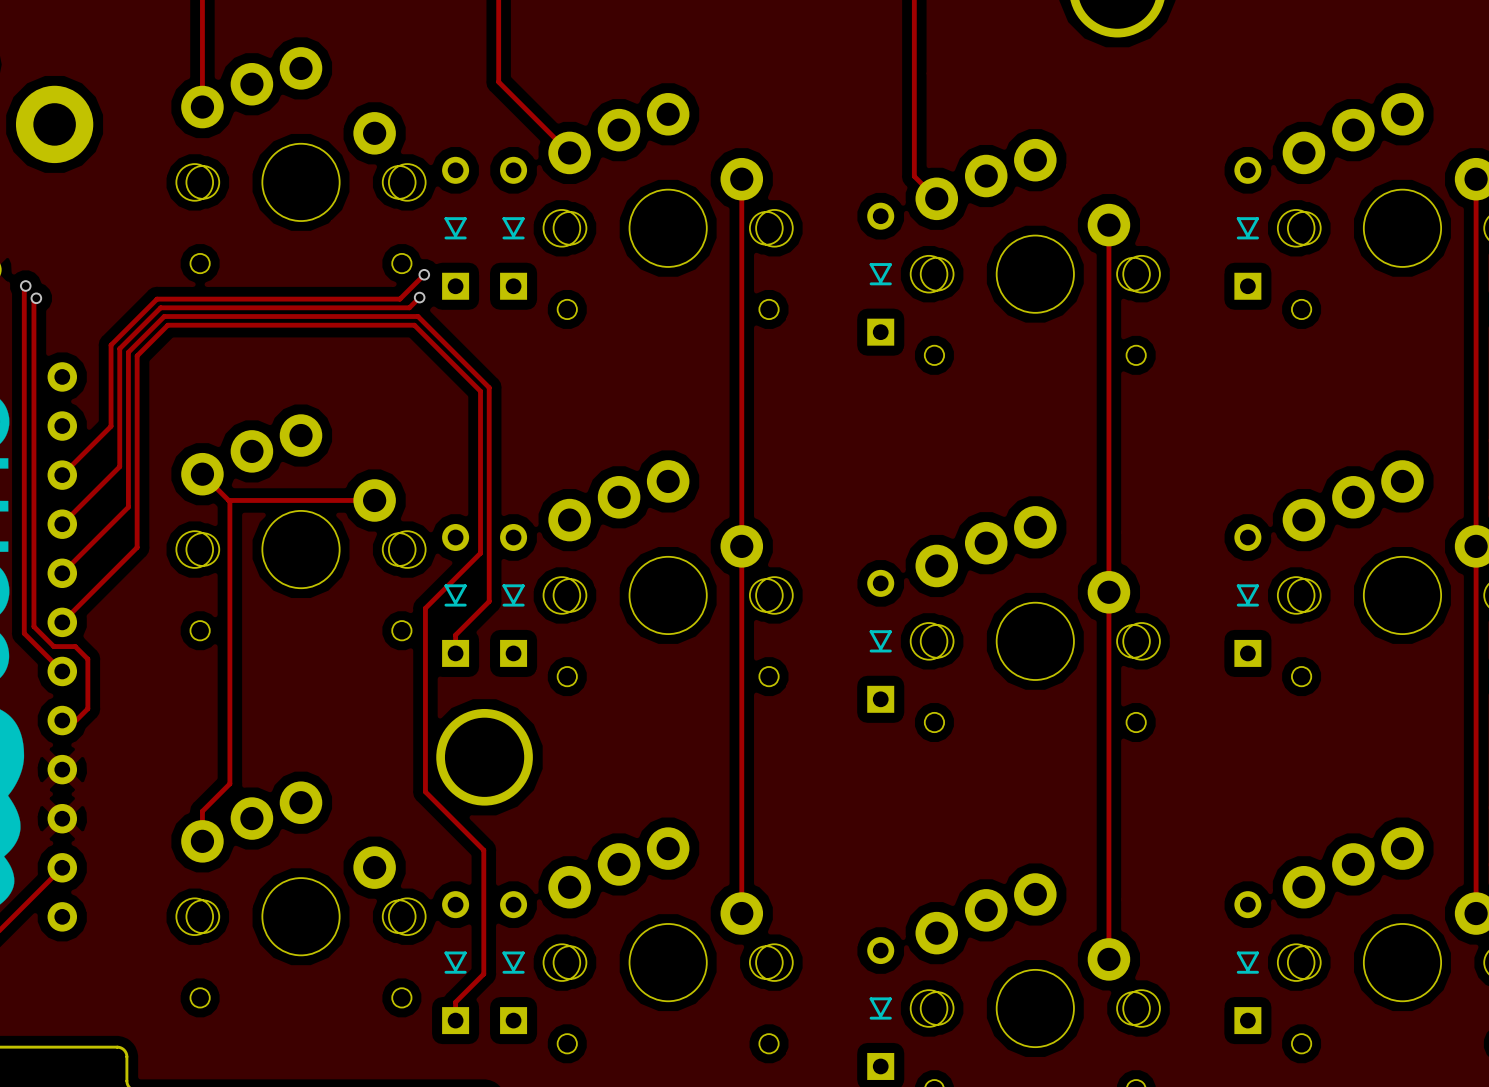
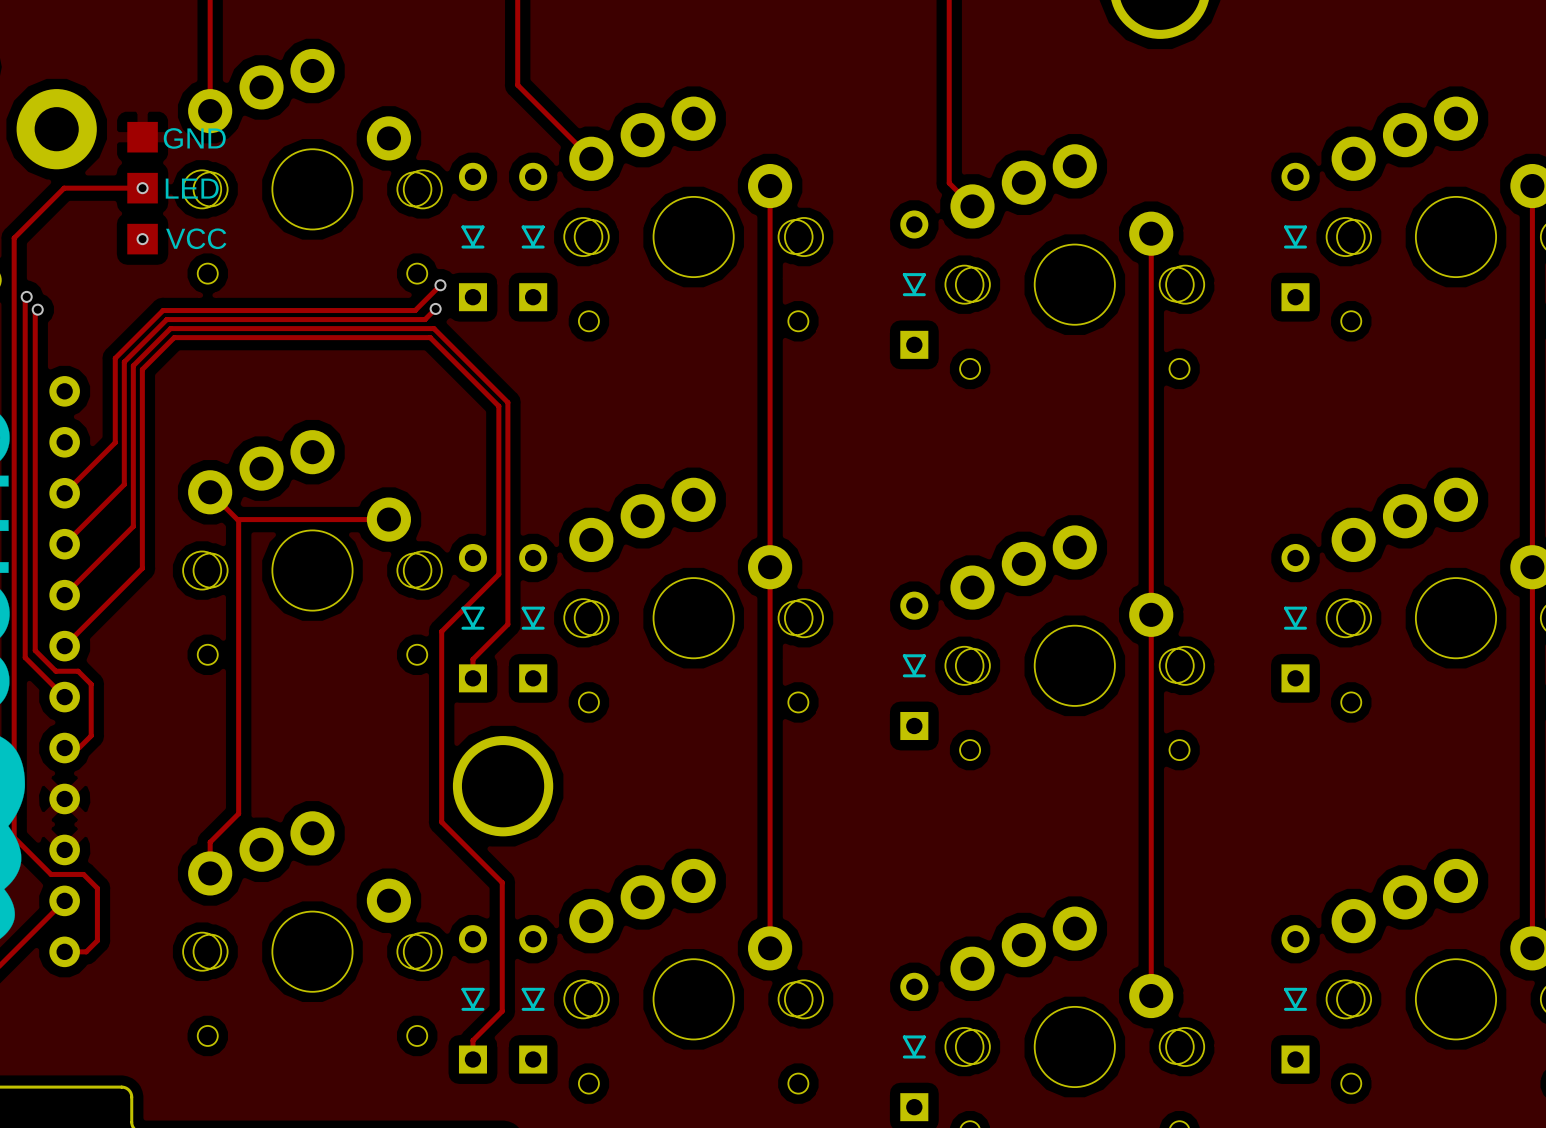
track: none -> (142, 188) (64, 188) (14, 238) (14, 837) (51, 874) (83, 874) (97, 888) (97, 940) (86, 951) (64, 951)
part: none -> (142, 188)
via: none -> (142, 188)
via: none -> (142, 239)

